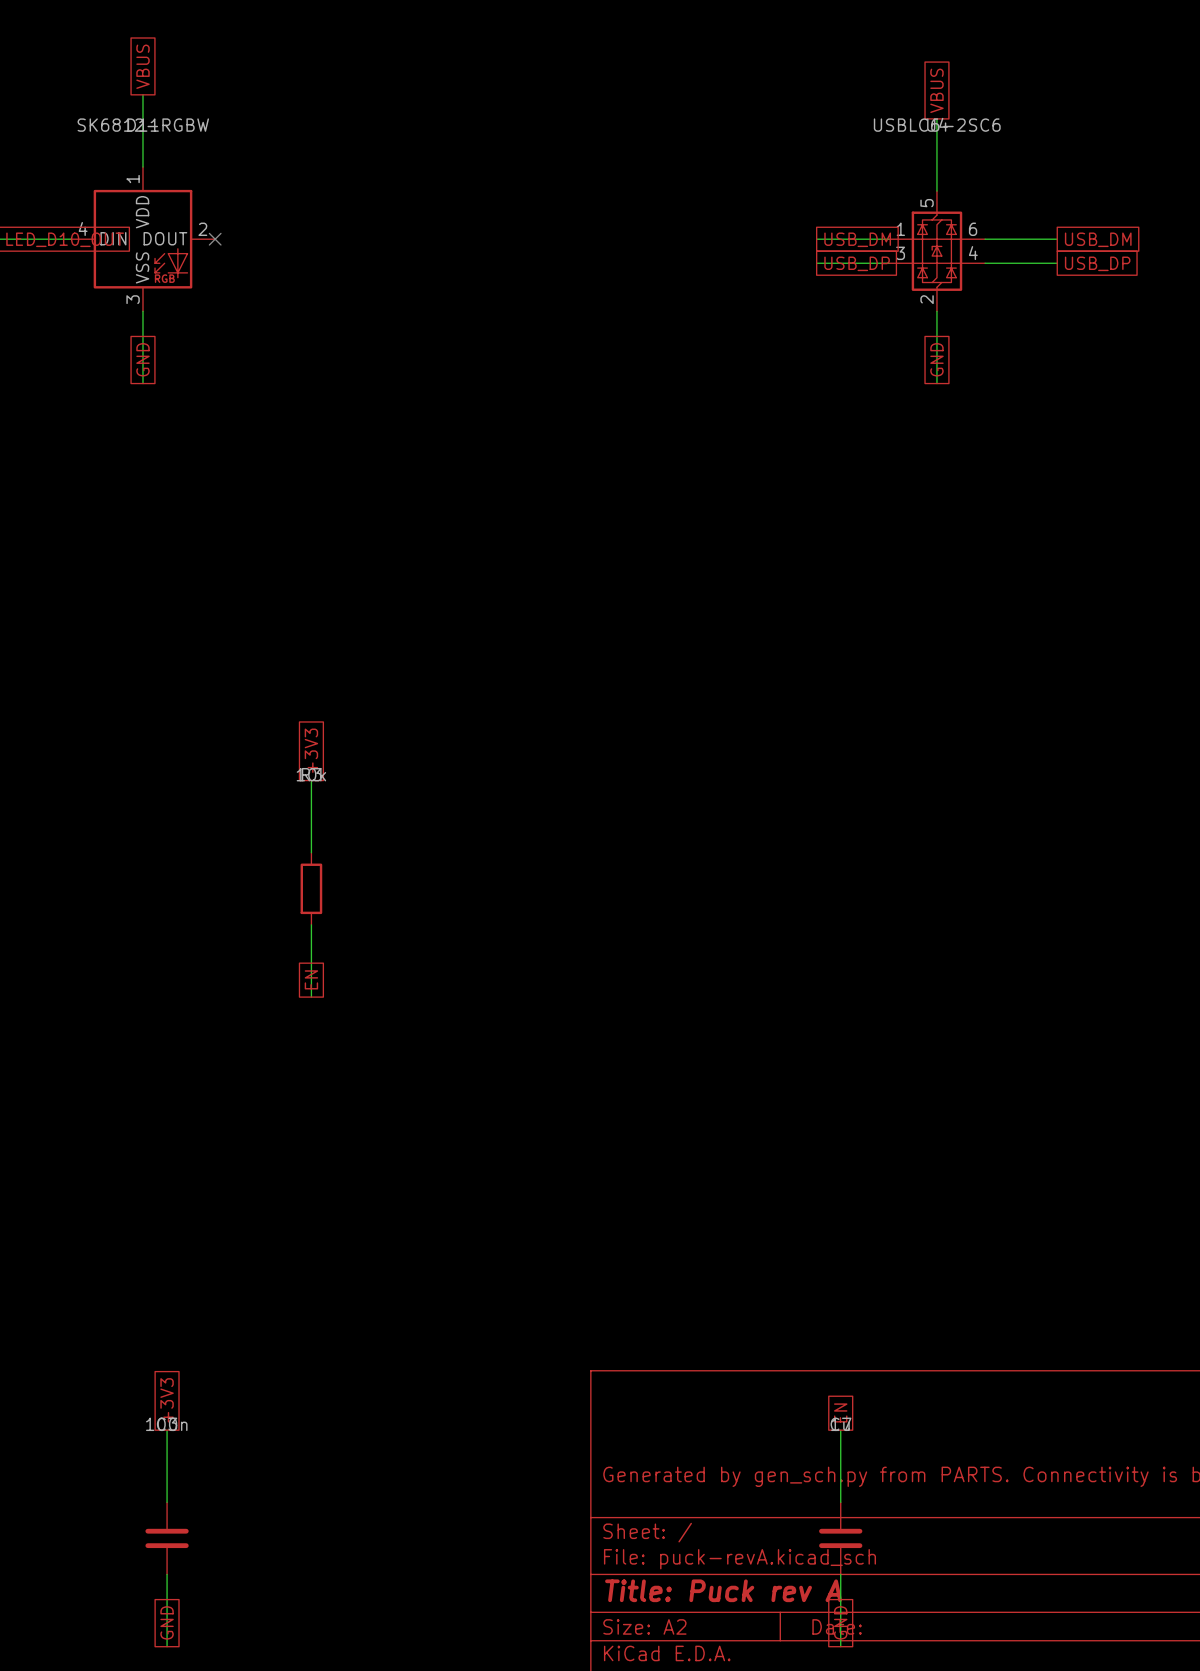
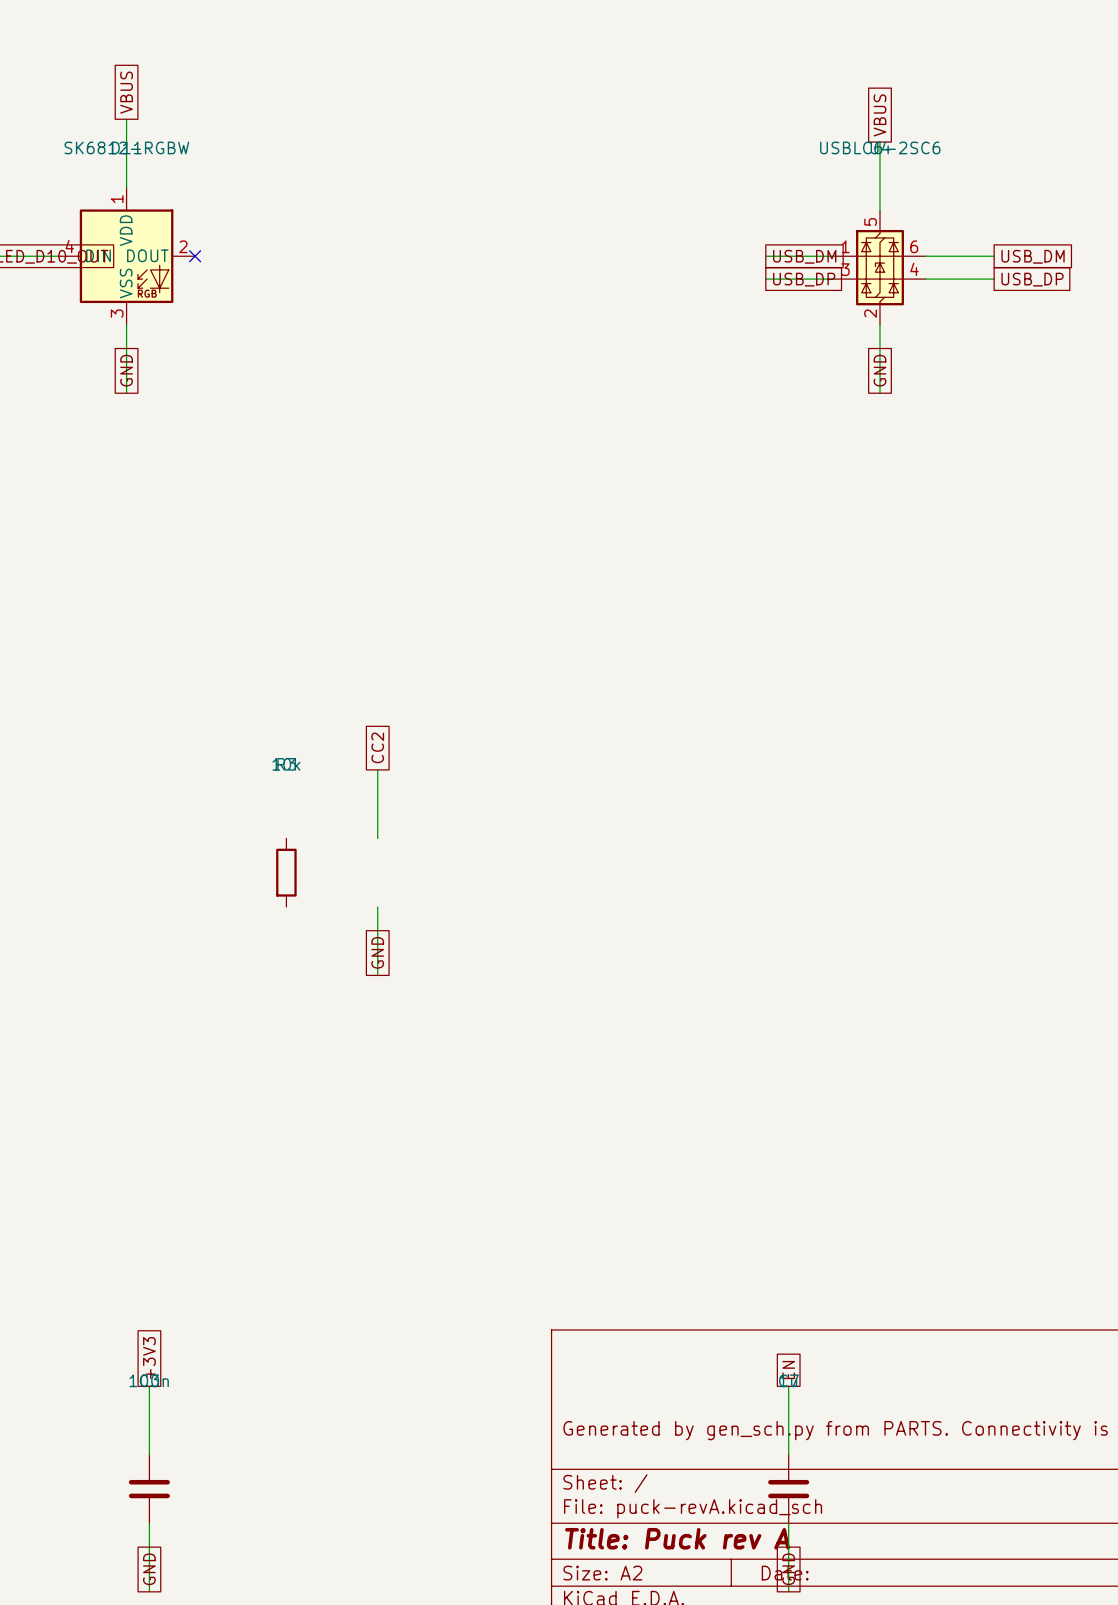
global label: +3V3 (311, 750) -> none
global label: none -> CC2 (377, 747)
wire: (311, 780) (311, 852) -> (377, 769) (377, 838)
wire: (311, 924) (311, 997) -> (377, 906) (377, 975)
global label: none -> GND (377, 952)
global label: EN (311, 979) -> none

